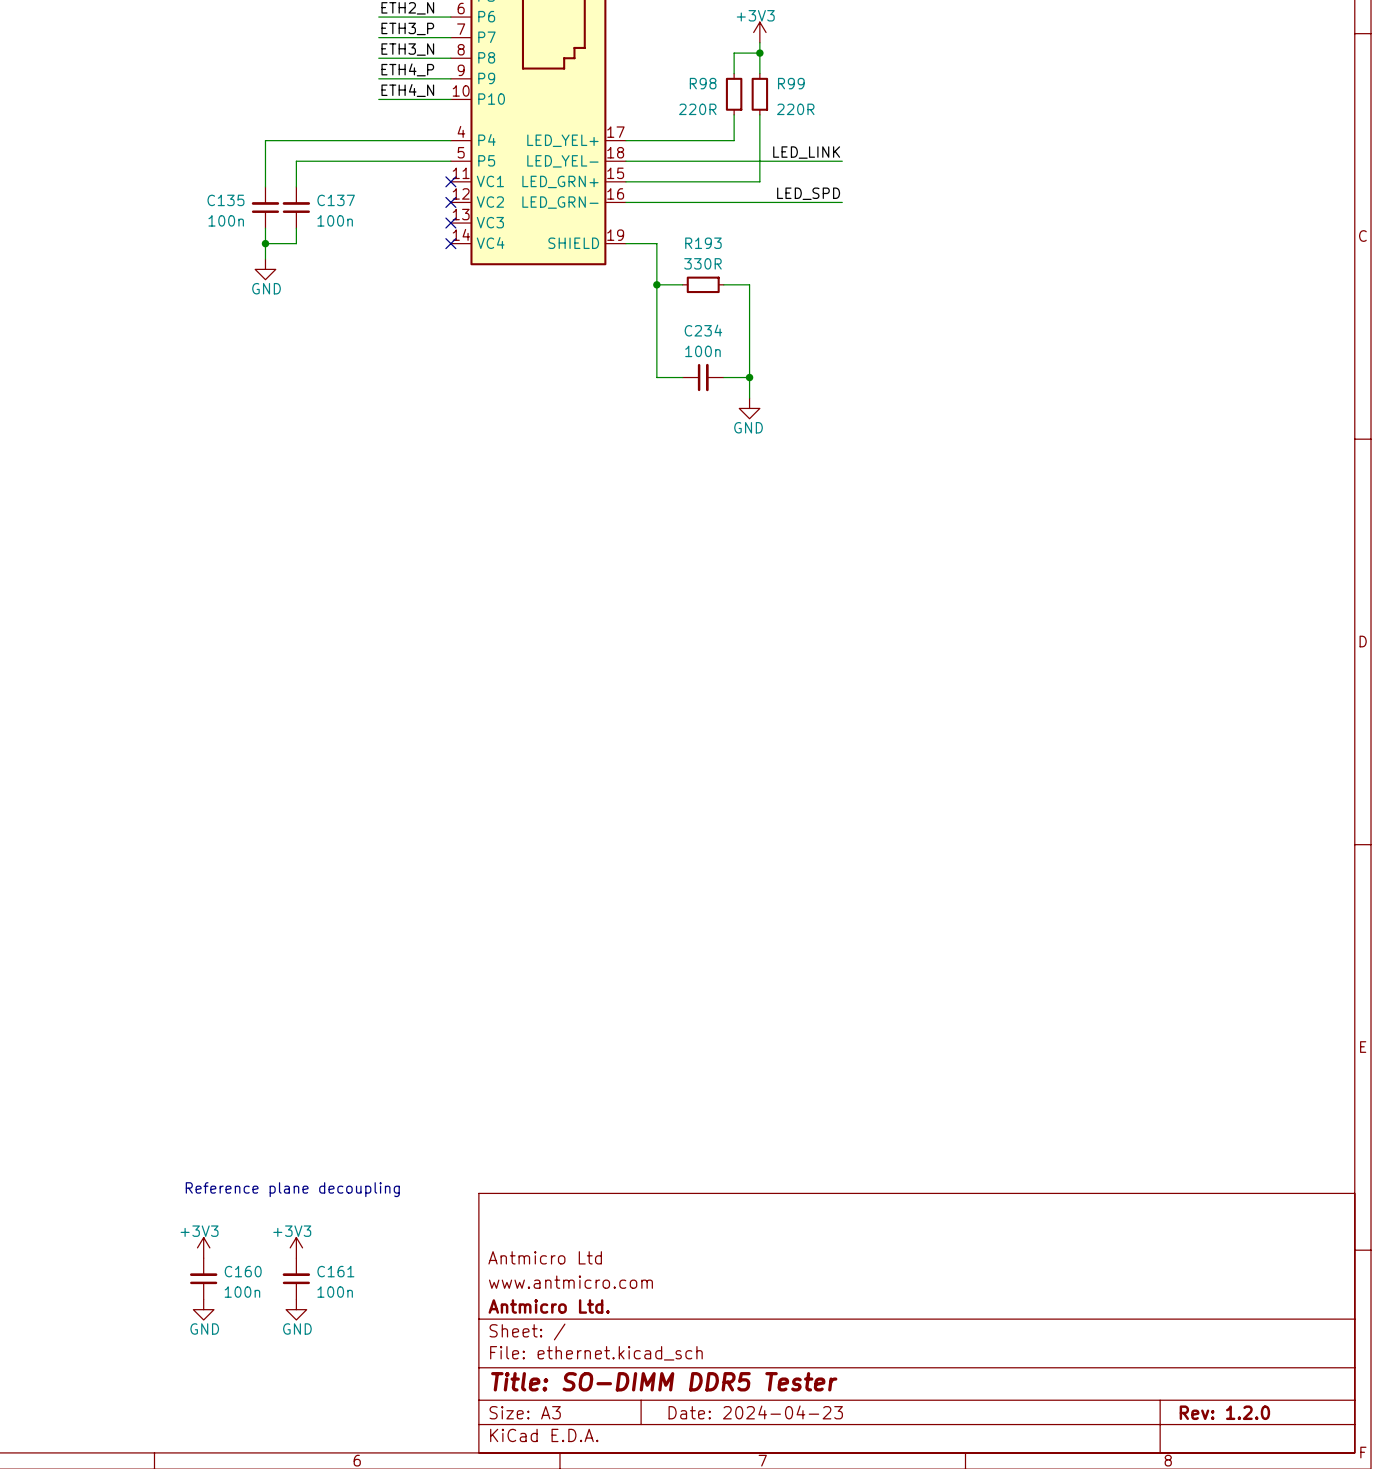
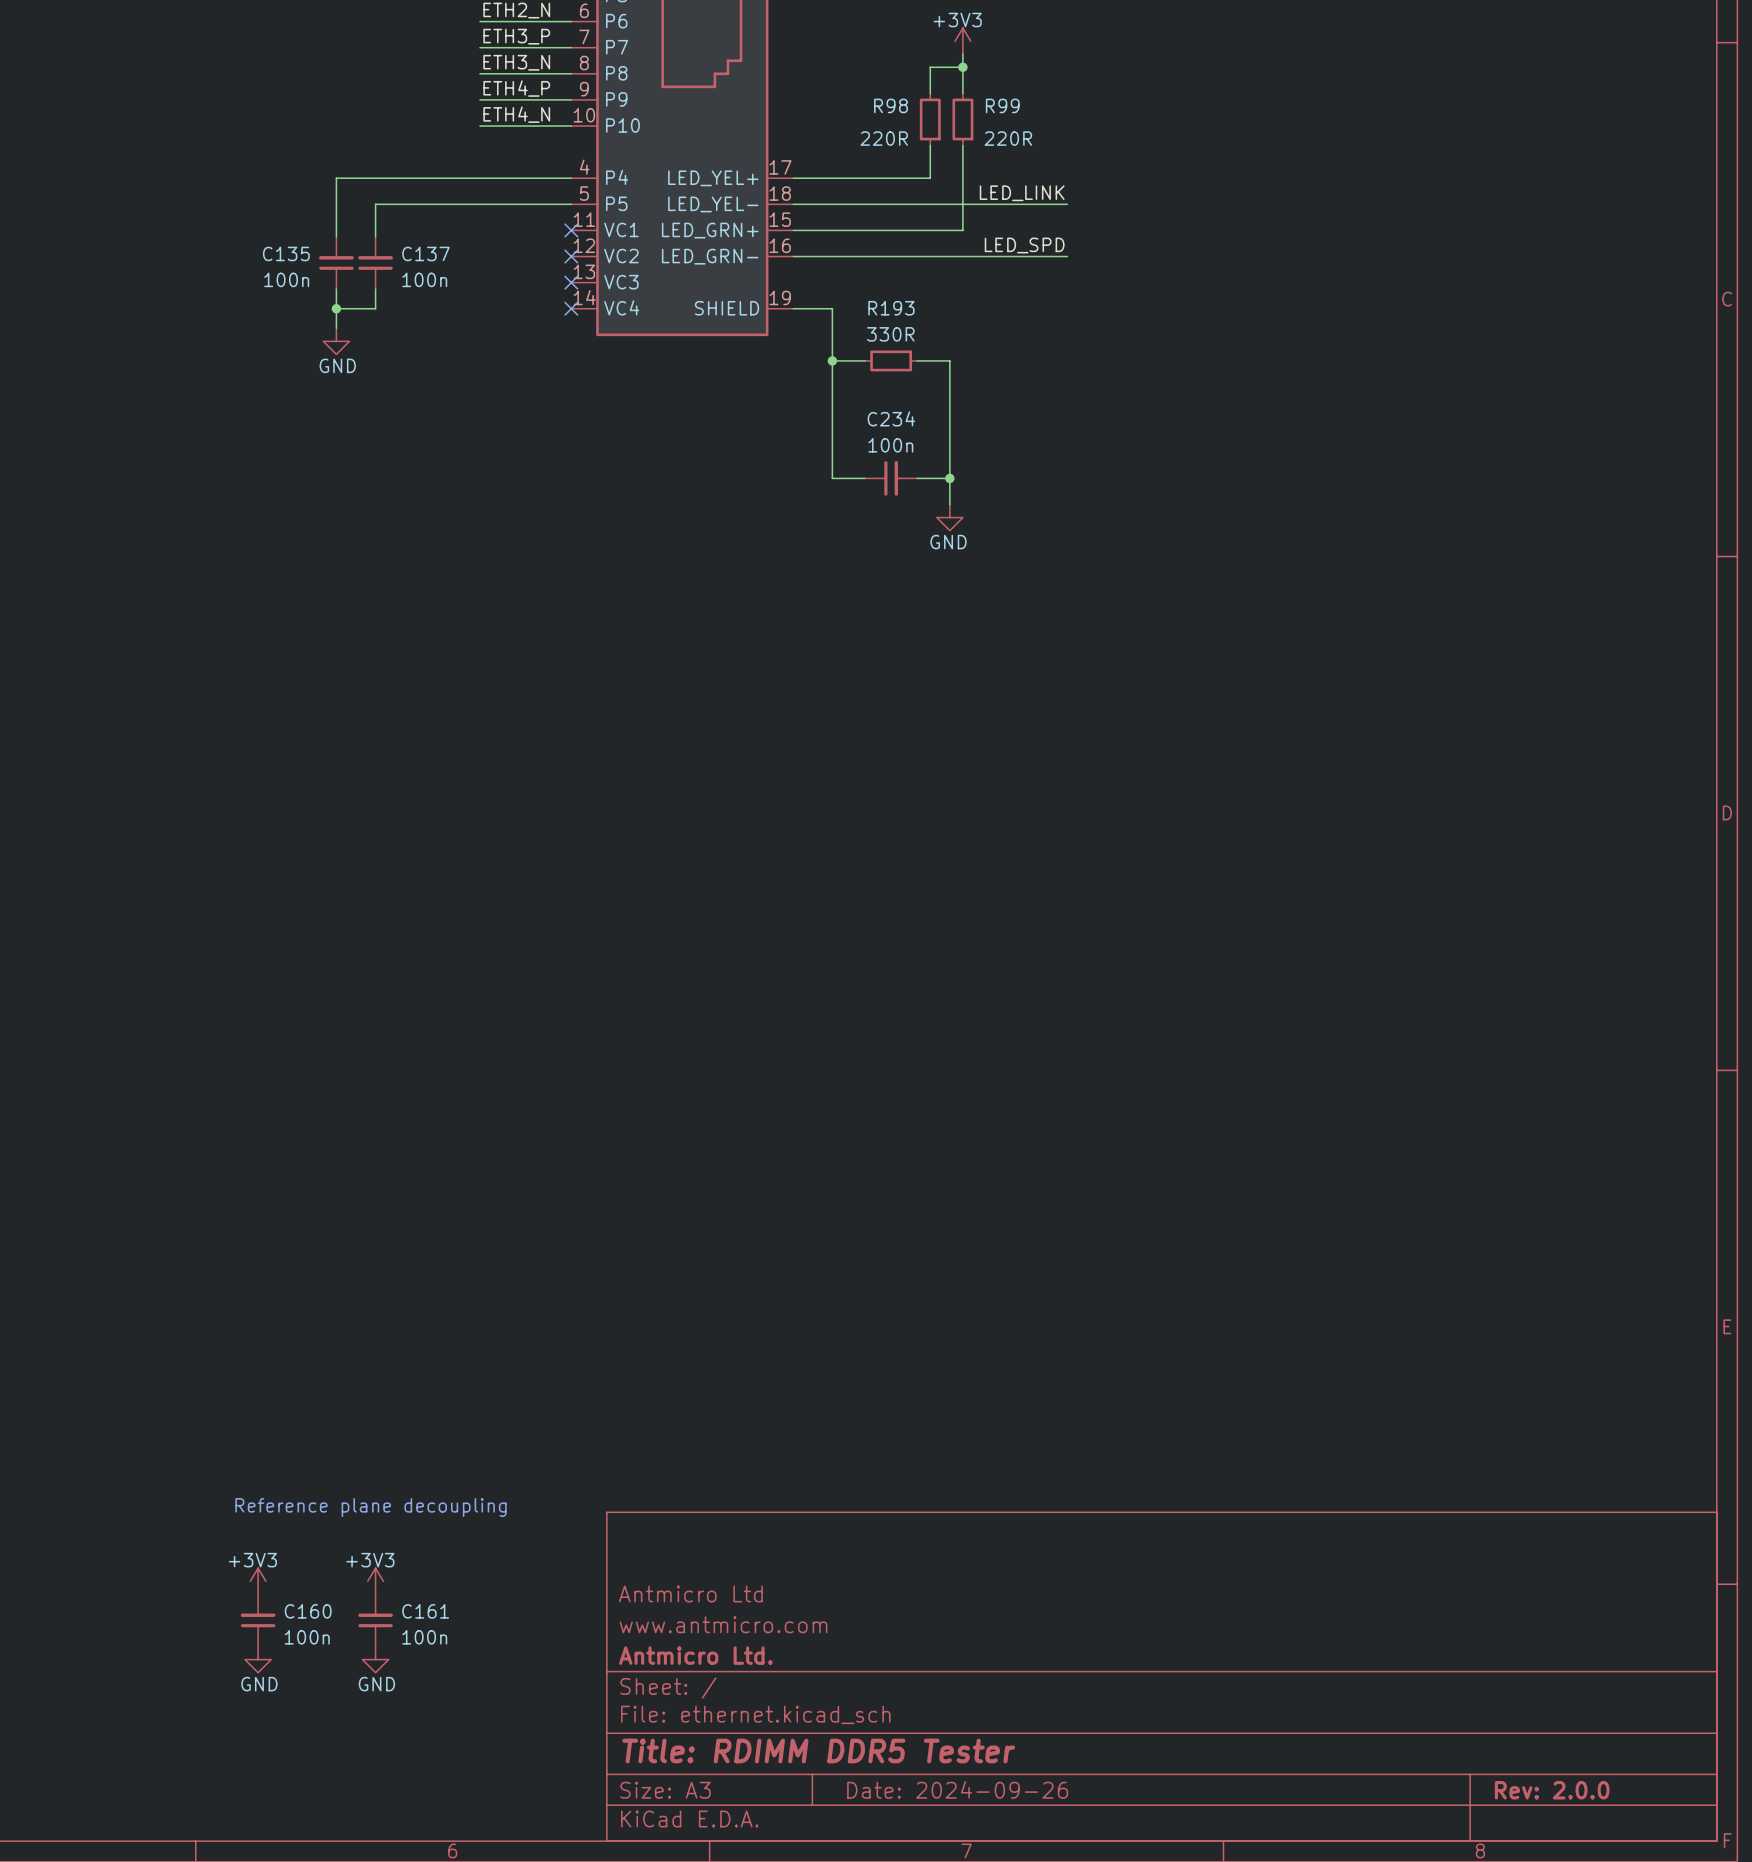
title block: Title: SO-DIMM DDR5 Tester (664, 1381) -> Title: RDIMM DDR5 Tester (818, 1750)
title block: Date: 2024-04-23 (755, 1412) -> Date: 2024-09-26 (957, 1789)
title block: Rev: 1.2.0 (1224, 1412) -> Rev: 2.0.0 (1552, 1790)

